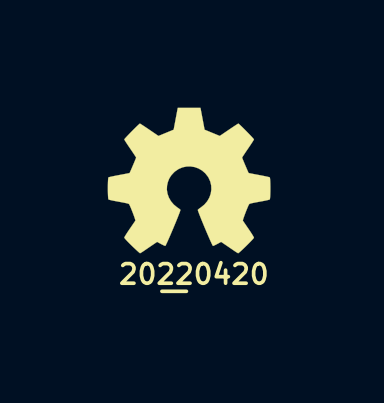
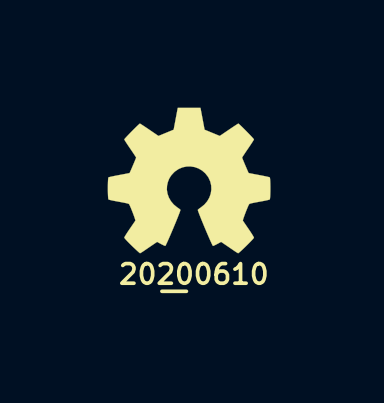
drawing shape: [119, 260, 267, 294] -> [119, 261, 267, 294]

